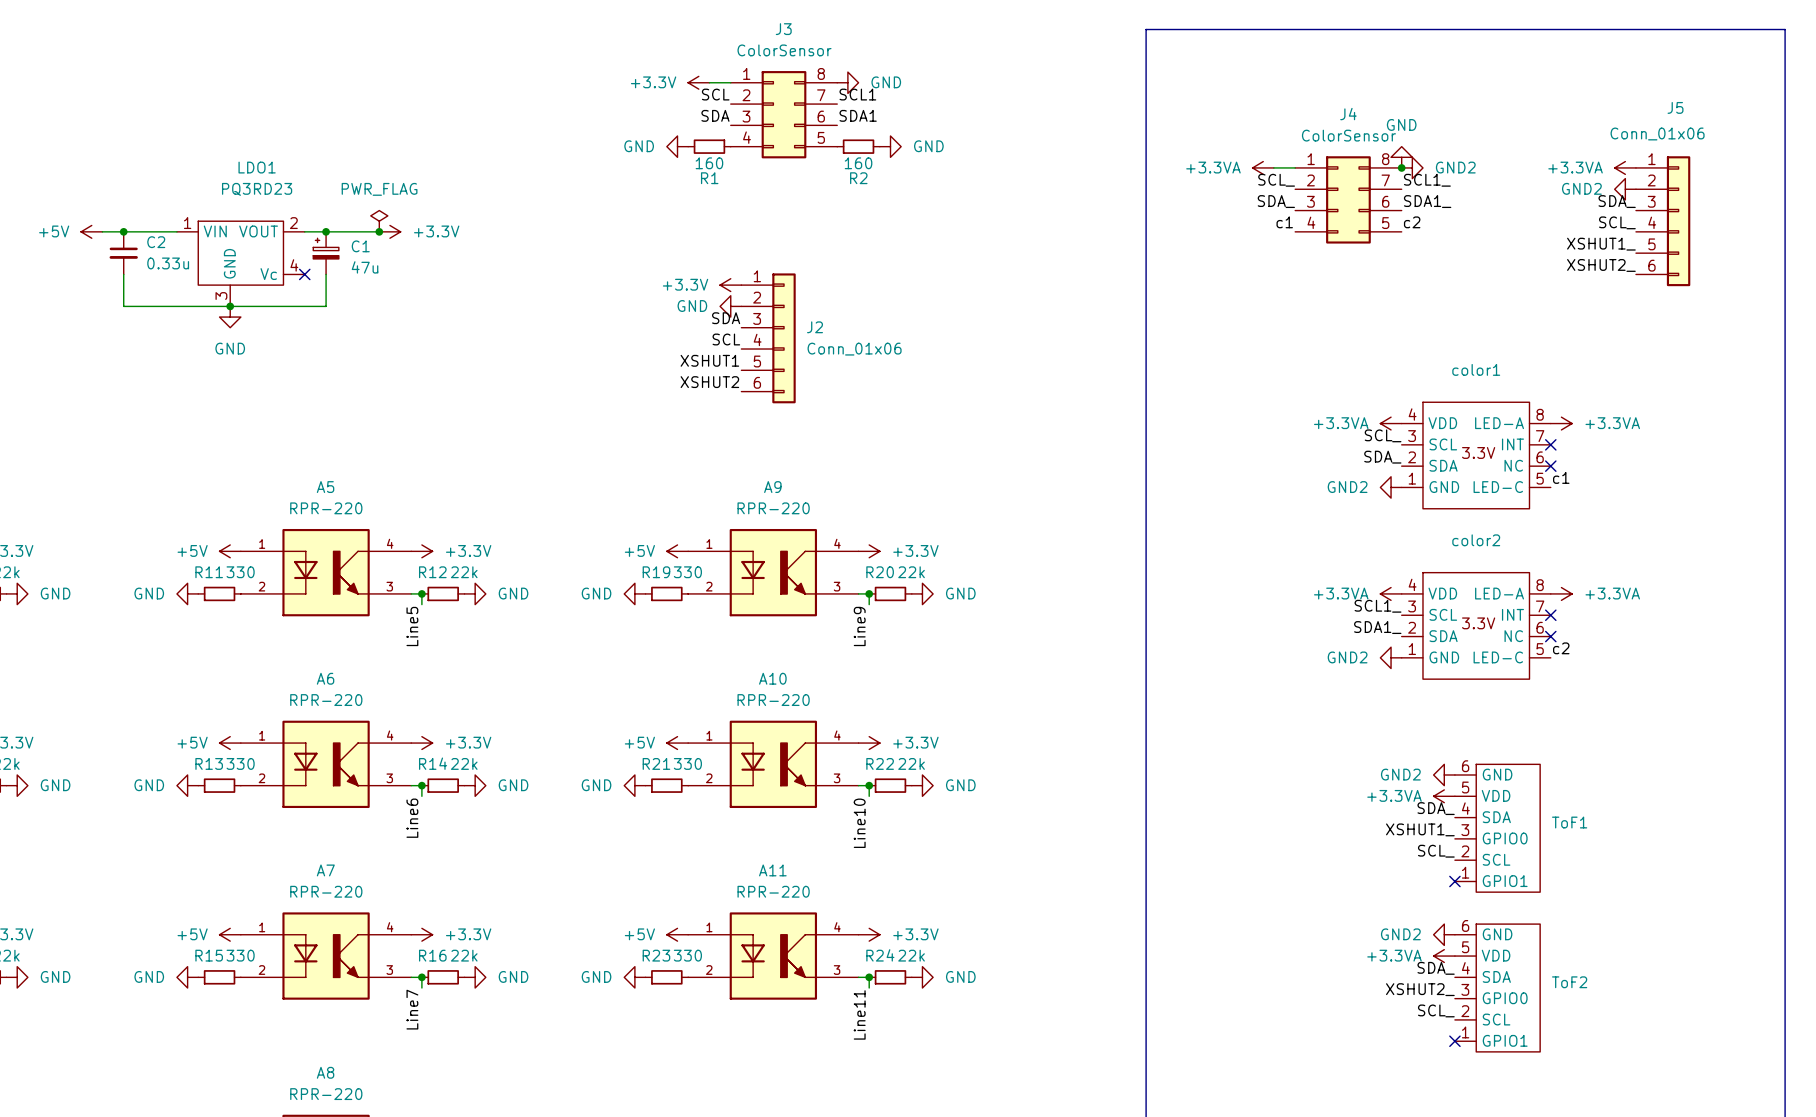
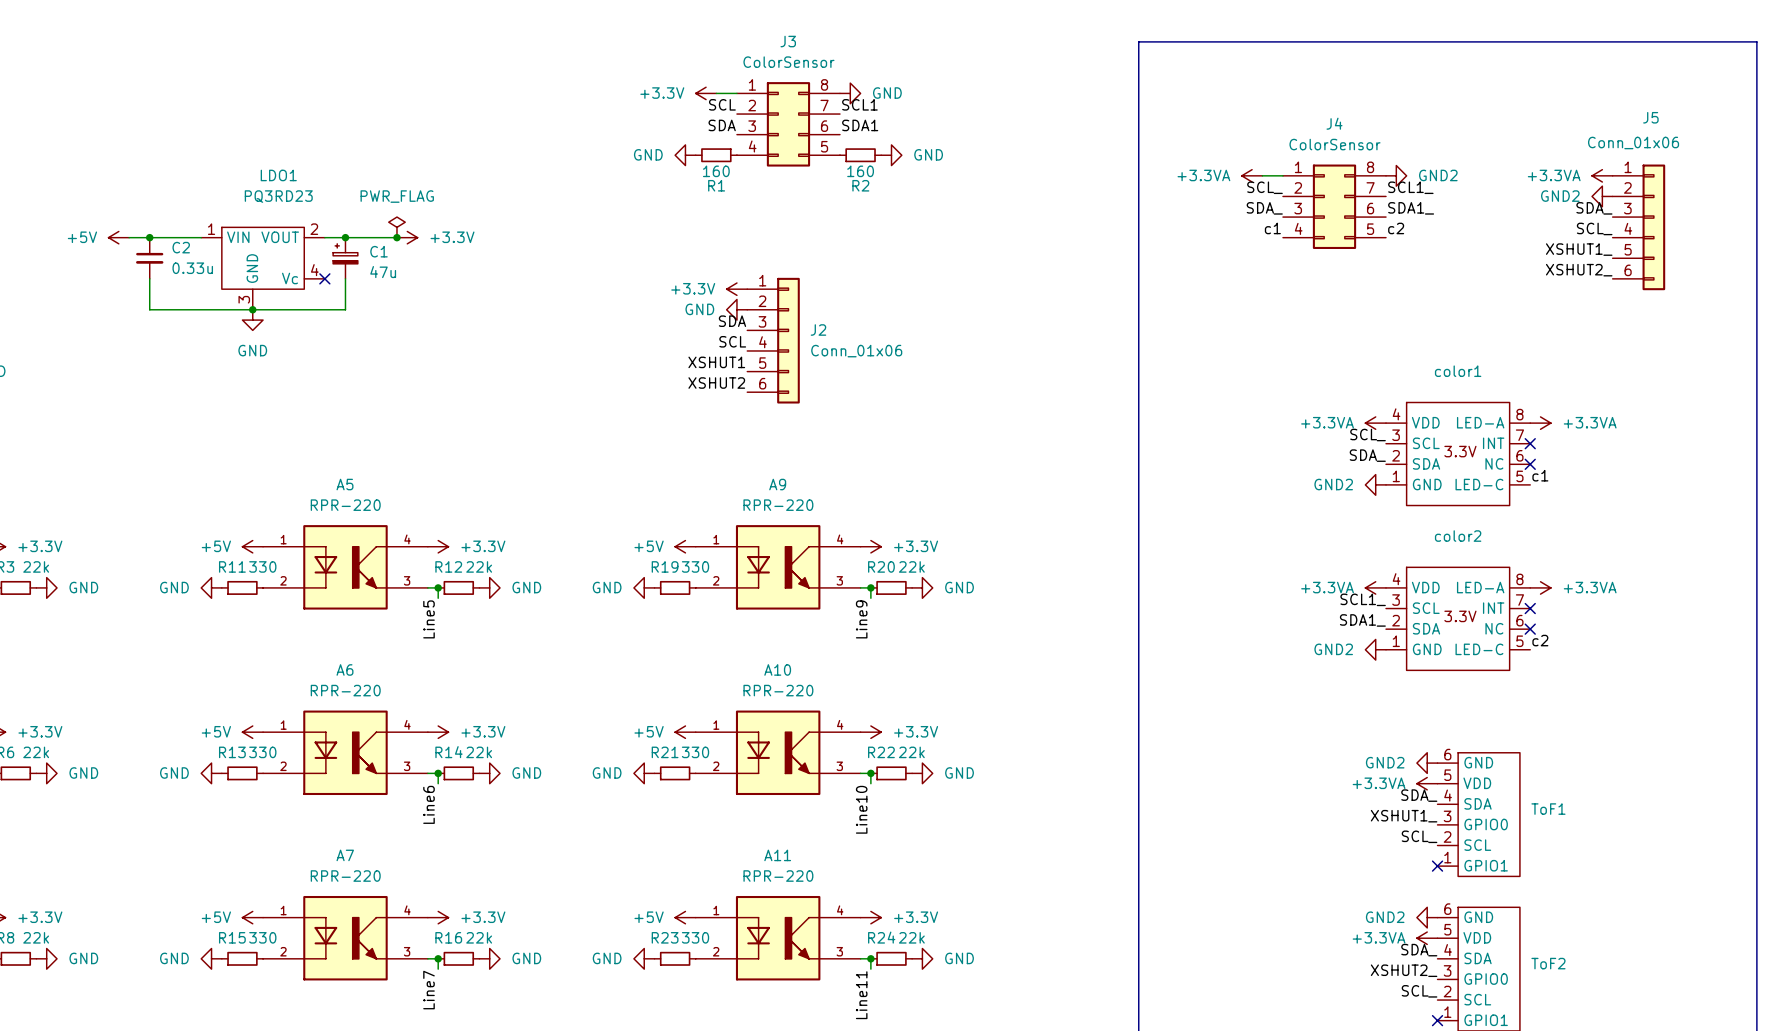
power symbol: GND (1401, 157) -> none
junction: (1401, 167) -> none

